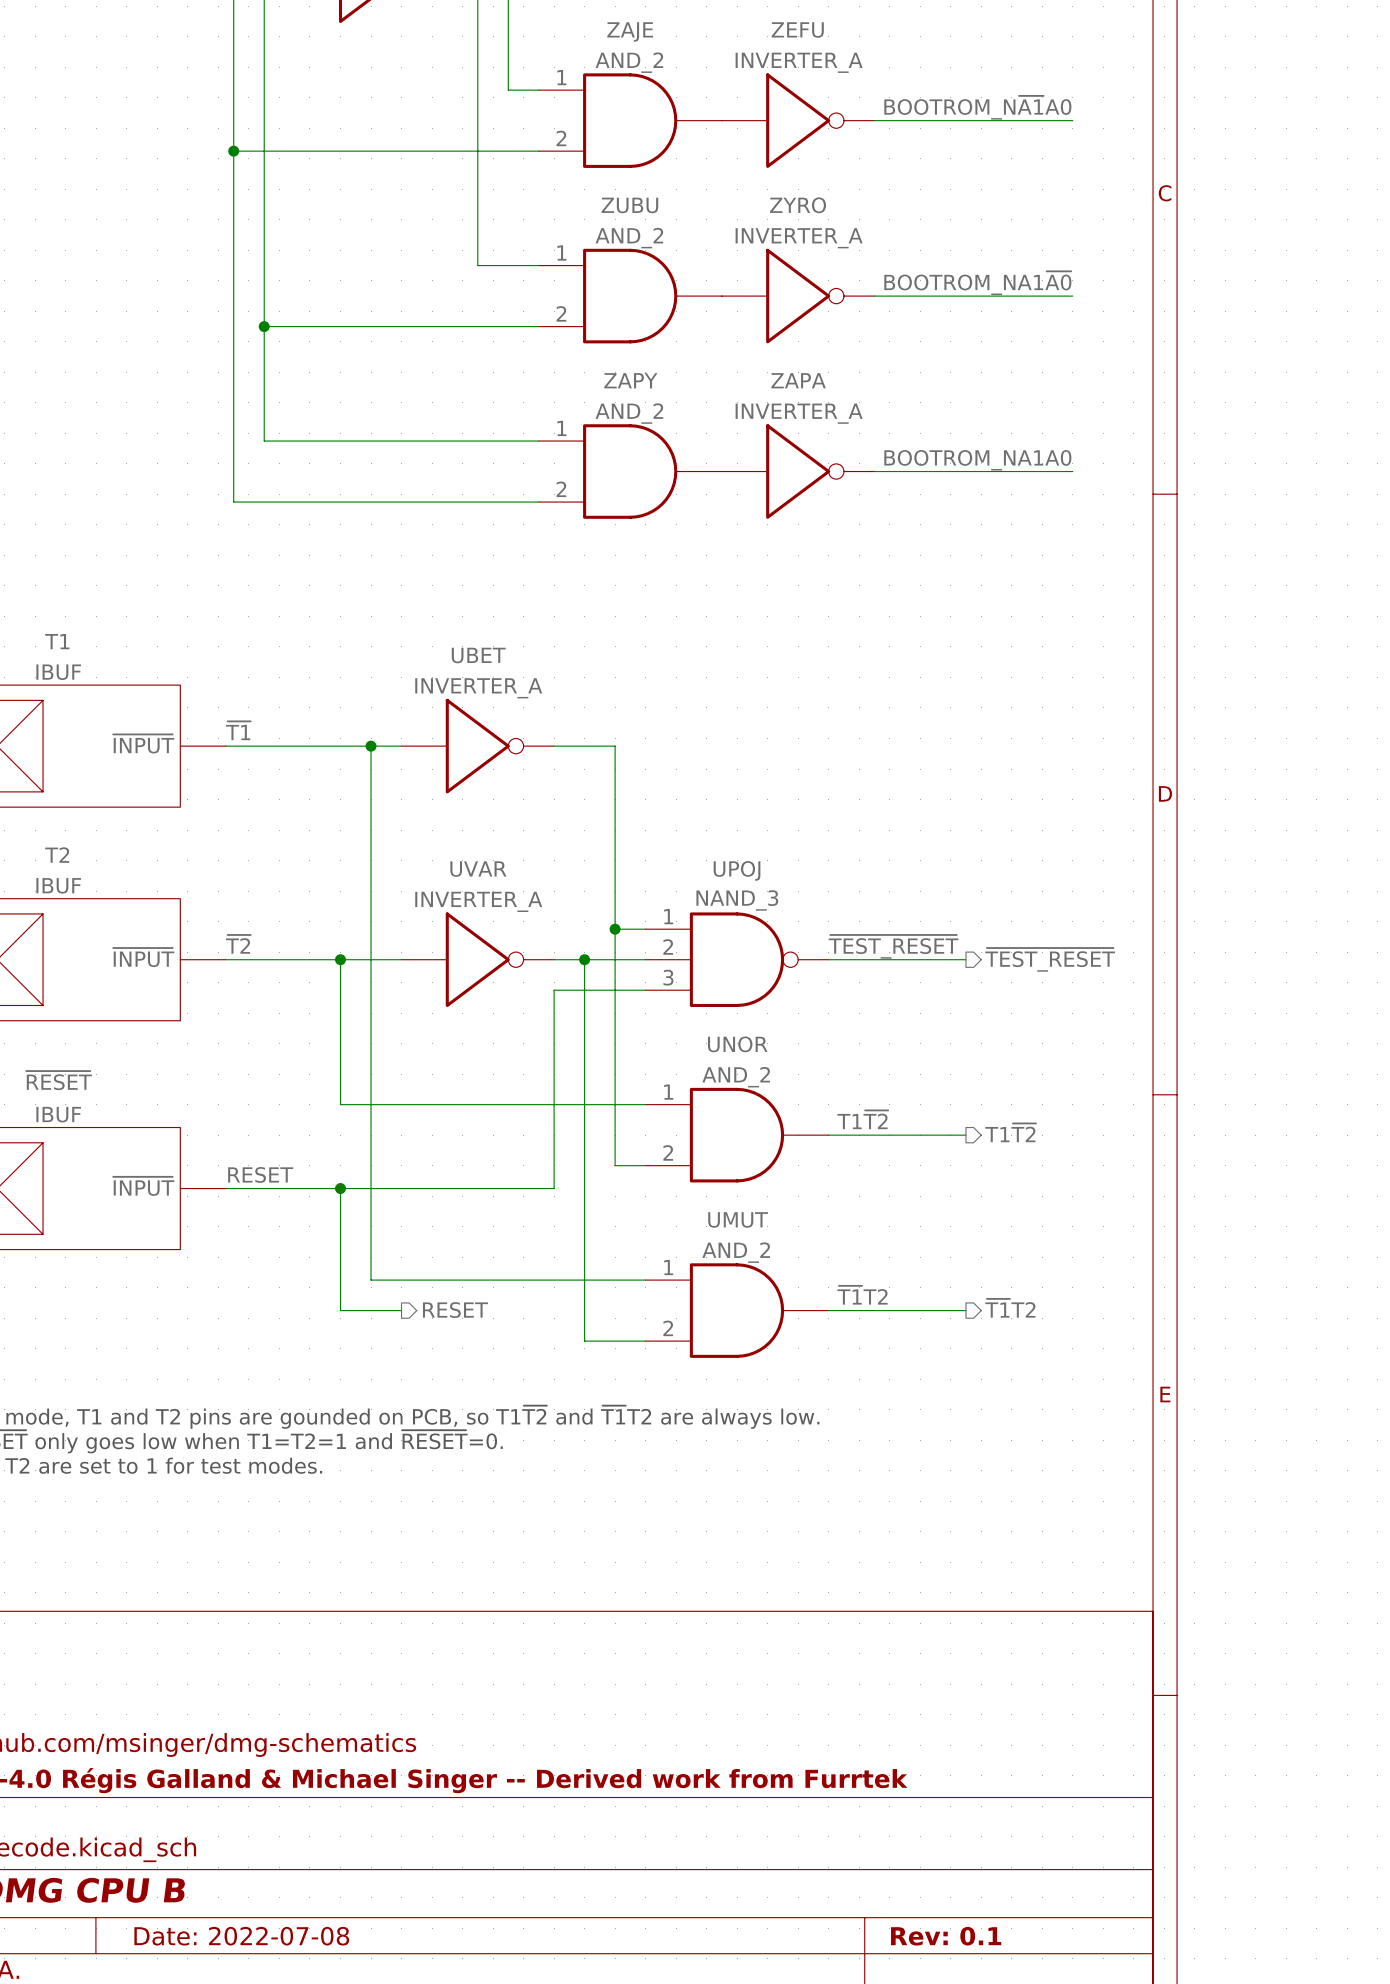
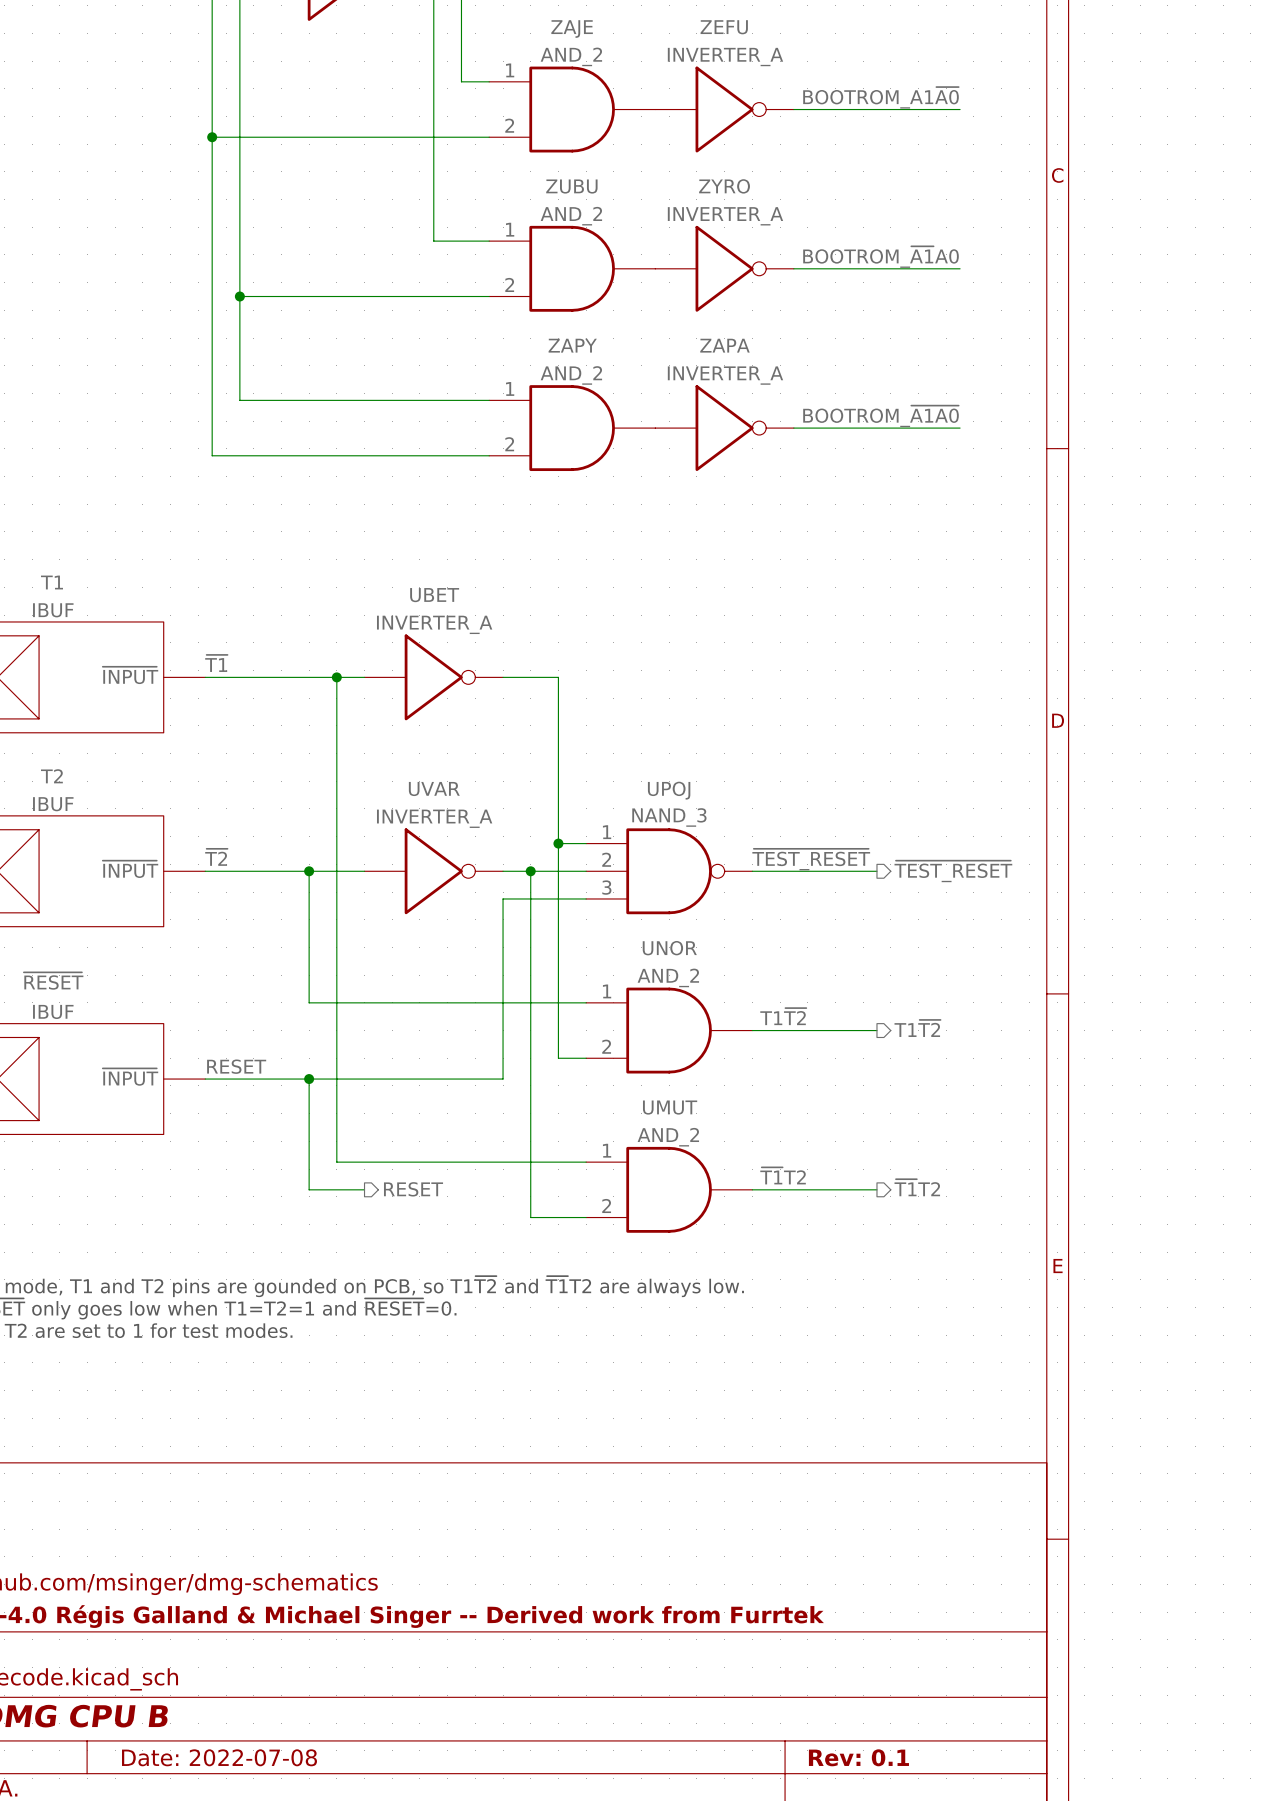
label: BOOTROM_N~{A1}A0 (977, 107) -> BOOTROM_A1~{A0} (881, 97)
wire: (1057, 120) (1072, 120) -> none
label: BOOTROM_NA1~{A0} (977, 283) -> BOOTROM_~{A1}A0 (881, 257)
wire: (1057, 296) (1072, 296) -> none
label: BOOTROM_NA1A0 (977, 460) -> BOOTROM_~{A1A0} (881, 416)
wire: (1057, 471) (1072, 471) -> none

